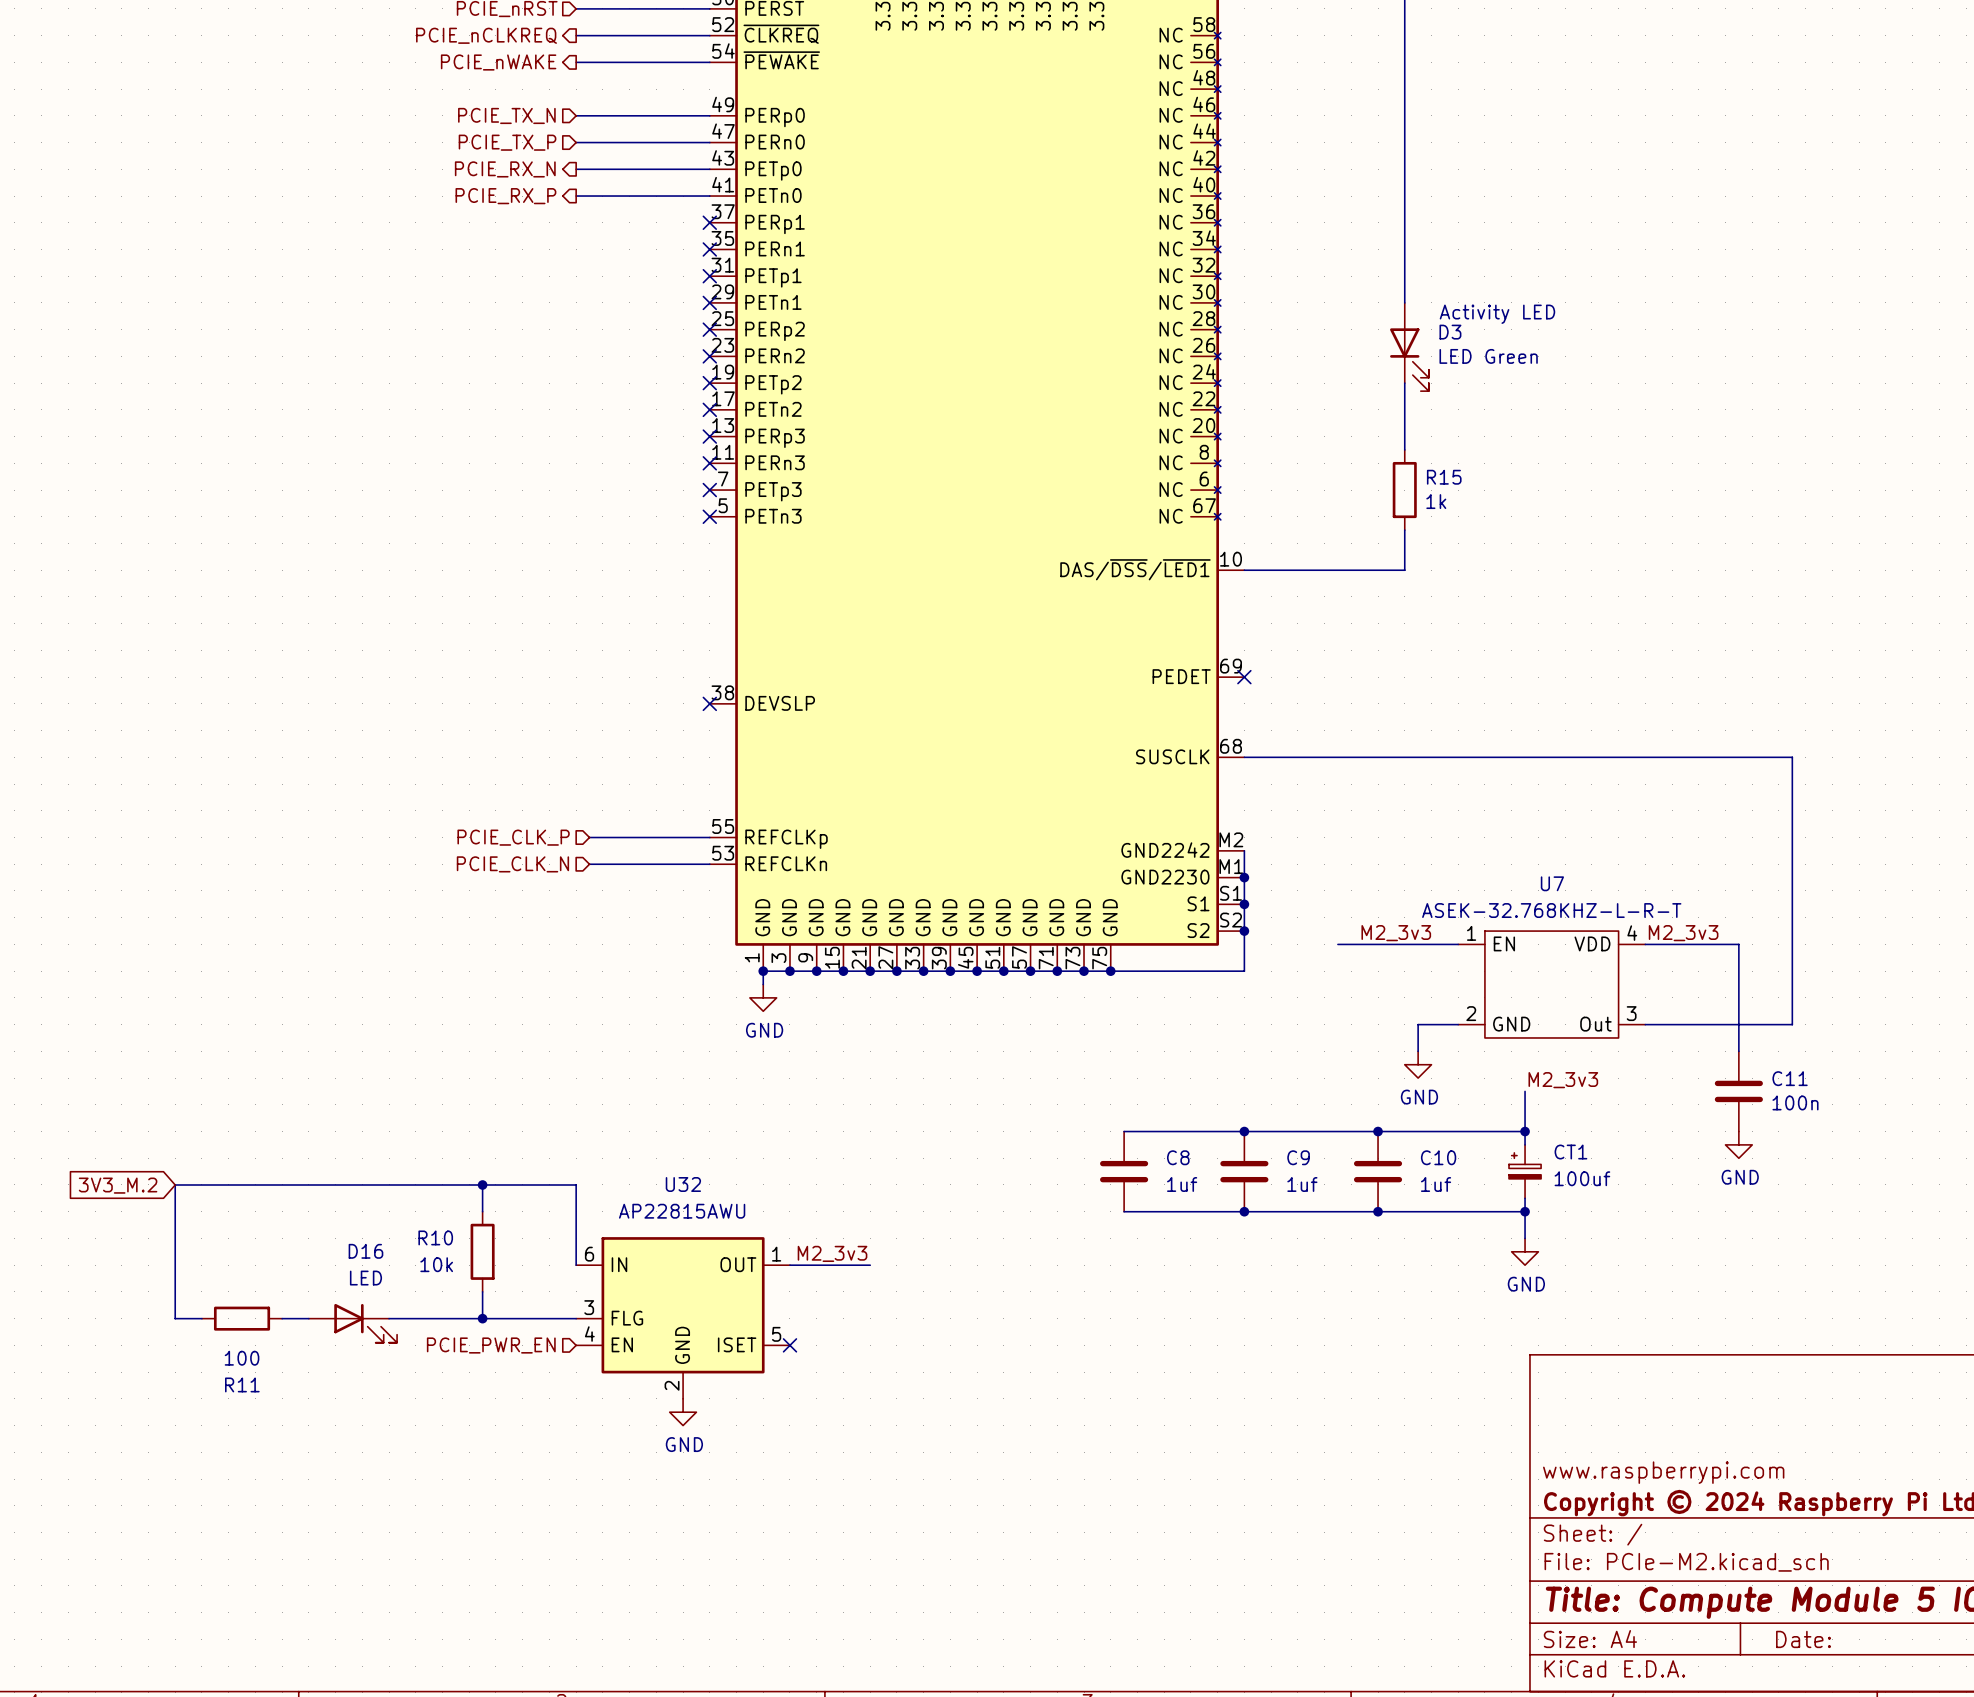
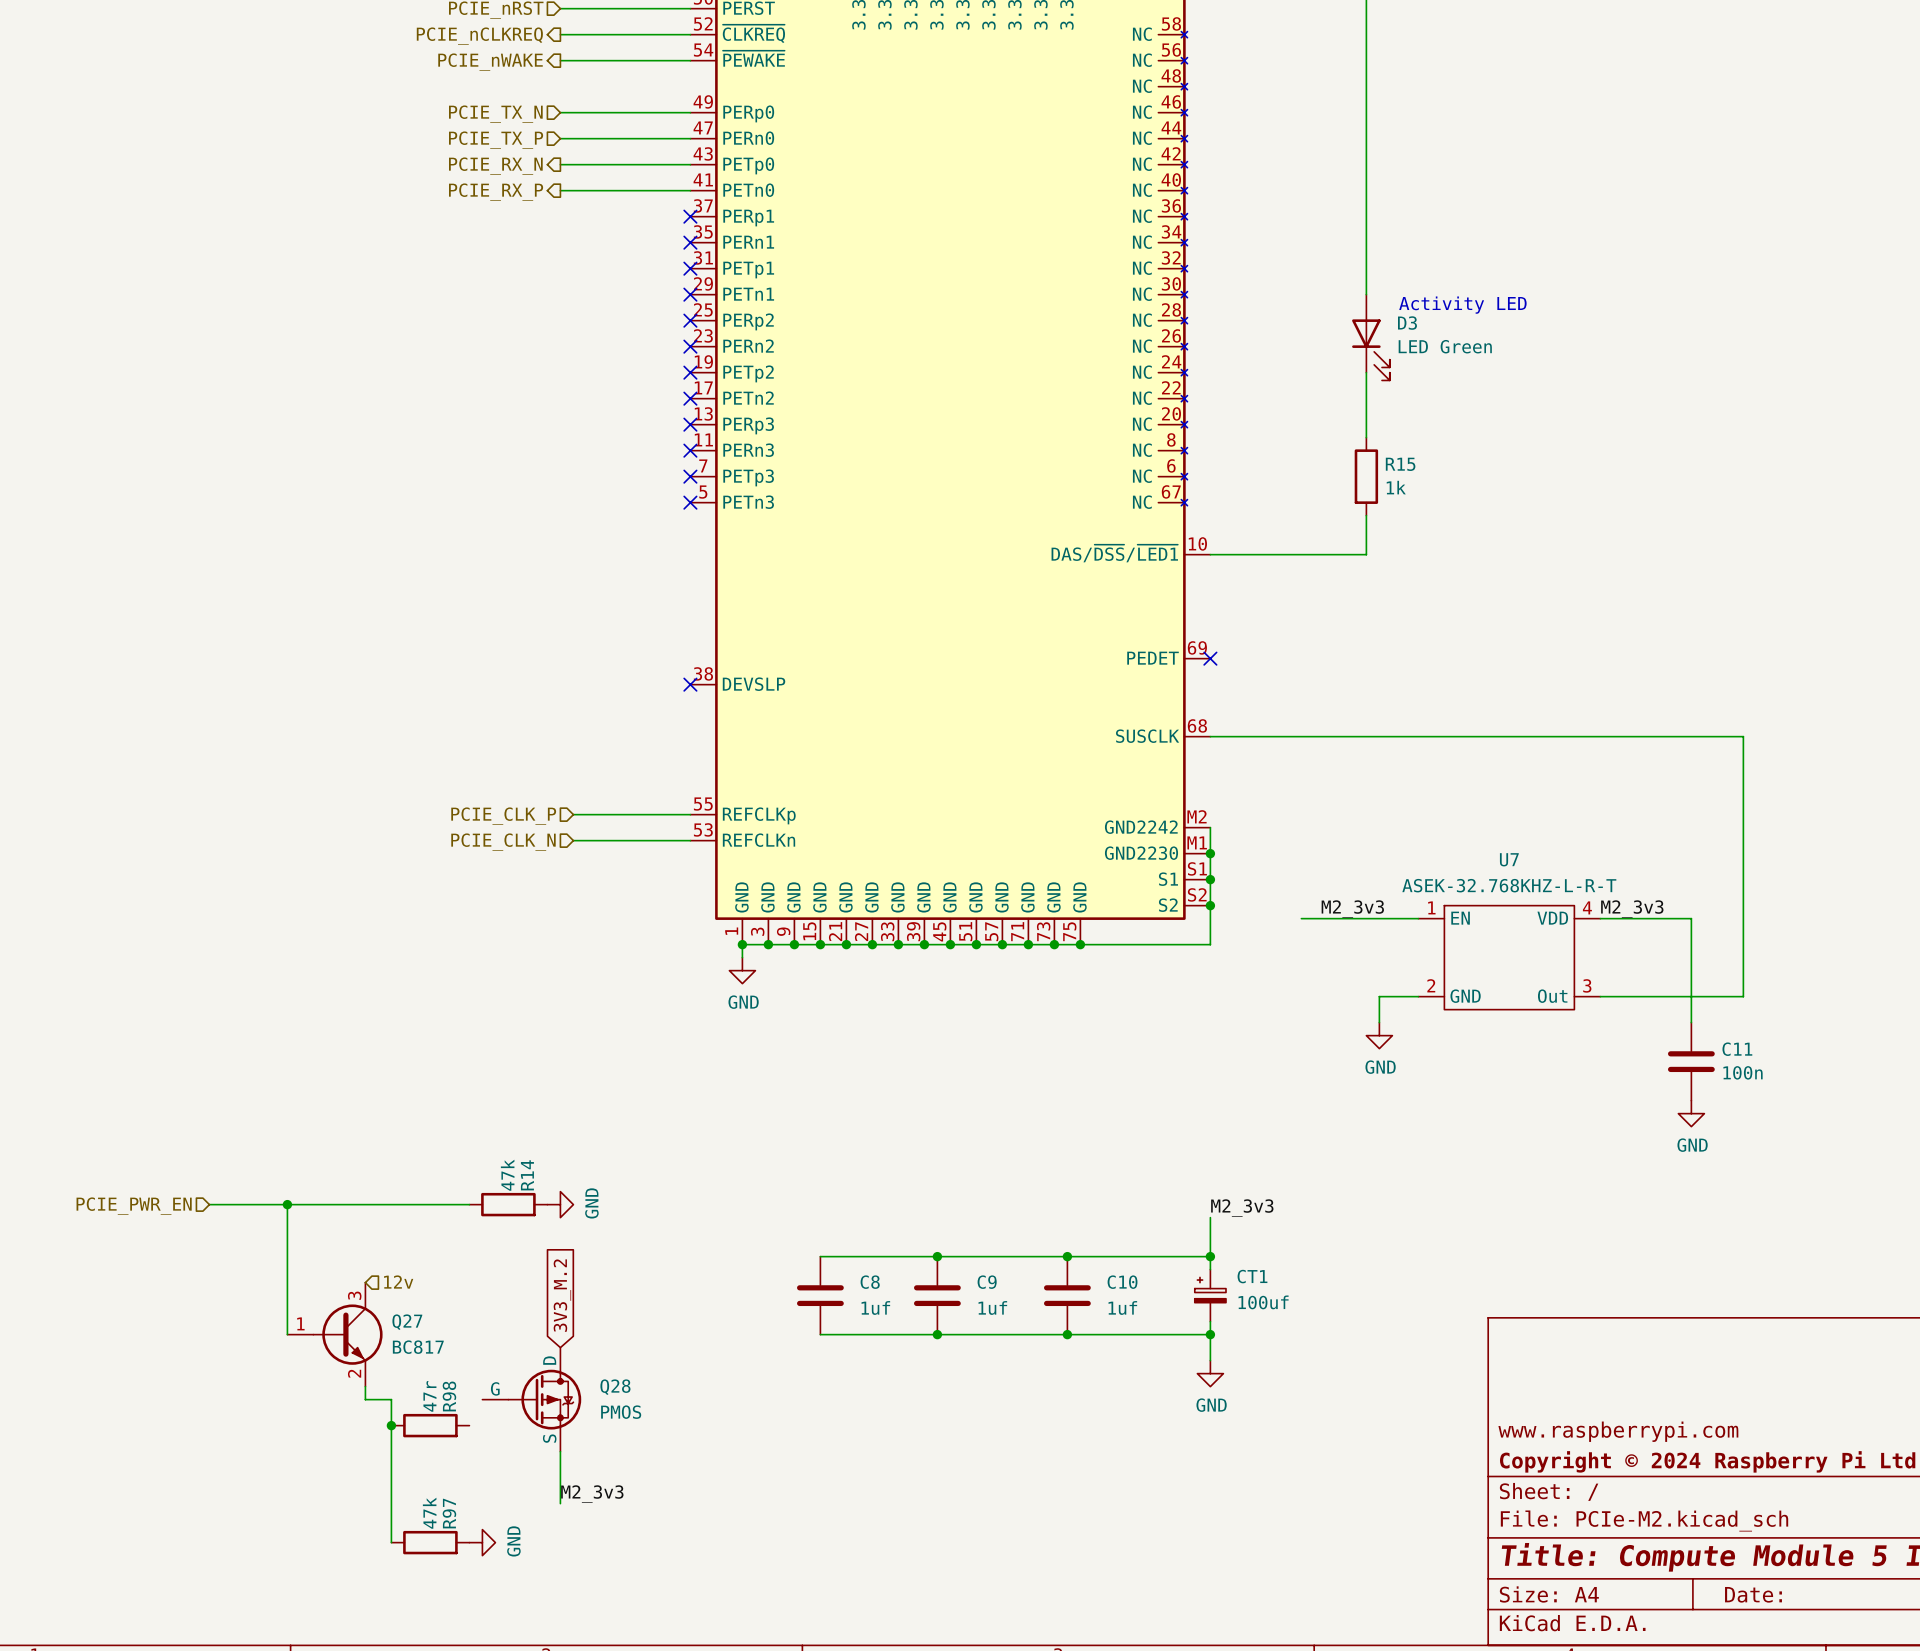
label: M2_3v3 (1563, 1080) -> none
wire: (1525, 1091) (1525, 1144) -> none
wire: (1124, 1131) (1525, 1131) -> none
junction: (1244, 1131) -> none
junction: (1378, 1131) -> none
junction: (1525, 1131) -> none
C8 position: (1124, 1171) -> (820, 1295)
C9 position: (1244, 1171) -> (937, 1295)
C10 position: (1378, 1171) -> (1067, 1295)
CT1 position: (1525, 1171) -> (1210, 1295)
wire: (482, 1184) (482, 1211) -> none
junction: (482, 1184) -> none
global label: 3V3_M.2 (118, 1185) -> none
wire: (1525, 1198) (1525, 1238) -> none
wire: (1124, 1211) (1525, 1211) -> none
junction: (1244, 1211) -> none
junction: (1378, 1211) -> none
junction: (1525, 1211) -> none
hierarchical label: none -> PCIE_PWR_EN (134, 1206)
wire: none -> (209, 1204) (469, 1204)
wire: none -> (287, 1204) (287, 1334)
junction: none -> (287, 1204)
R14: none -> 47k (508, 1204)
power symbol: none -> GND (560, 1204)
label: none -> M2_3v3 (1242, 1208)
R10: 10k (482, 1251) -> none
wire: none -> (1210, 1217) (1210, 1269)
power symbol: GND (1525, 1251) -> none
label: M2_3v3 (832, 1253) -> none
wire: (576, 1265) (576, 1184) (175, 1184) (175, 1318) (201, 1318) -> none
wire: (789, 1265) (870, 1265) -> none
wire: (482, 1291) (482, 1318) -> none
wire: none -> (820, 1256) (1210, 1256)
junction: none -> (937, 1256)
junction: none -> (1067, 1256)
junction: none -> (1210, 1256)
U32: AP22815AWU (683, 1317) -> none
R11: 100 (242, 1318) -> none
wire: (282, 1318) (308, 1318) -> none
wire: (389, 1318) (576, 1318) -> none
hierarchical label: none -> 12v (398, 1282)
junction: (482, 1318) -> none
D16: LED (352, 1323) -> none
global label: none -> 3V3_M.2 (562, 1295)
hierarchical label: PCIE_PWR_EN (491, 1345) -> none
no-connect mark: (789, 1345) -> none
wire: none -> (1210, 1321) (1210, 1360)
Q27: none -> BC817 (335, 1334)
wire: none -> (820, 1334) (1210, 1334)
junction: none -> (937, 1334)
junction: none -> (1067, 1334)
junction: none -> (1210, 1334)
power symbol: GND (683, 1412) -> none
power symbol: none -> GND (1210, 1373)
wire: none -> (365, 1386) (365, 1399) (391, 1399) (391, 1542)
Q28: none -> PMOS (531, 1399)
junction: none -> (391, 1425)
R98: none -> 47r (430, 1425)
wire: none -> (560, 1451) (560, 1503)
label: none -> M2_3v3 (592, 1494)
R97: none -> 47k (430, 1542)
power symbol: none -> GND (482, 1542)

